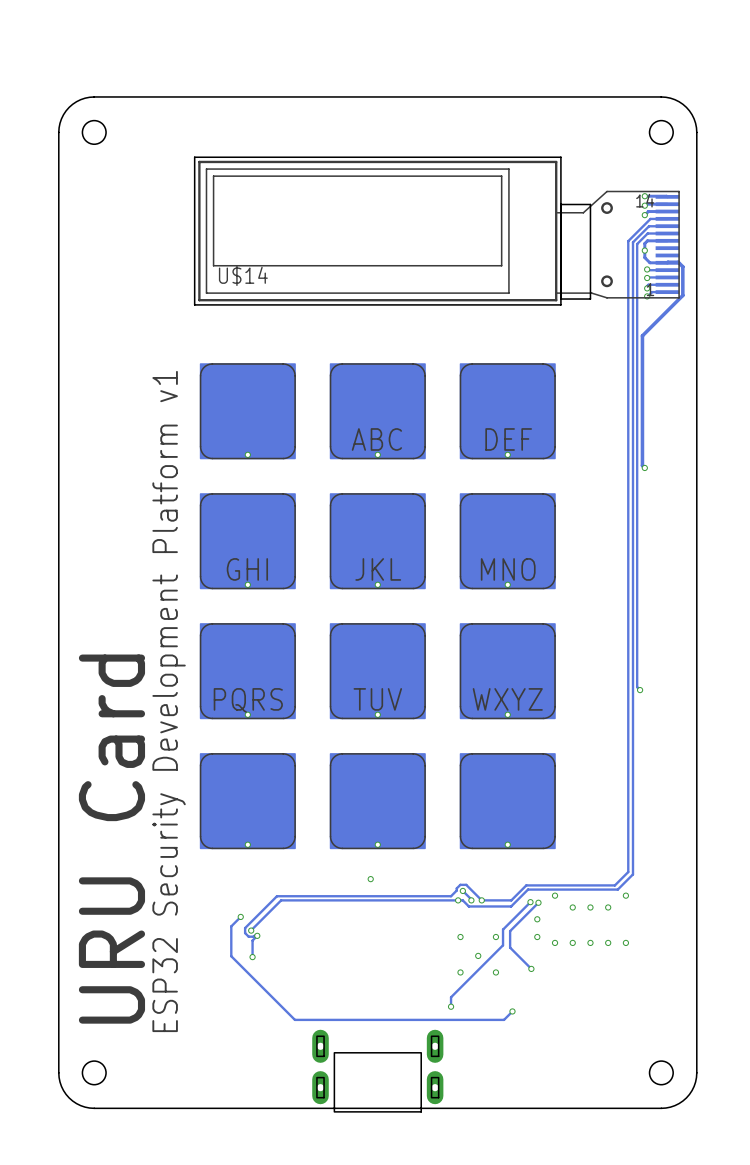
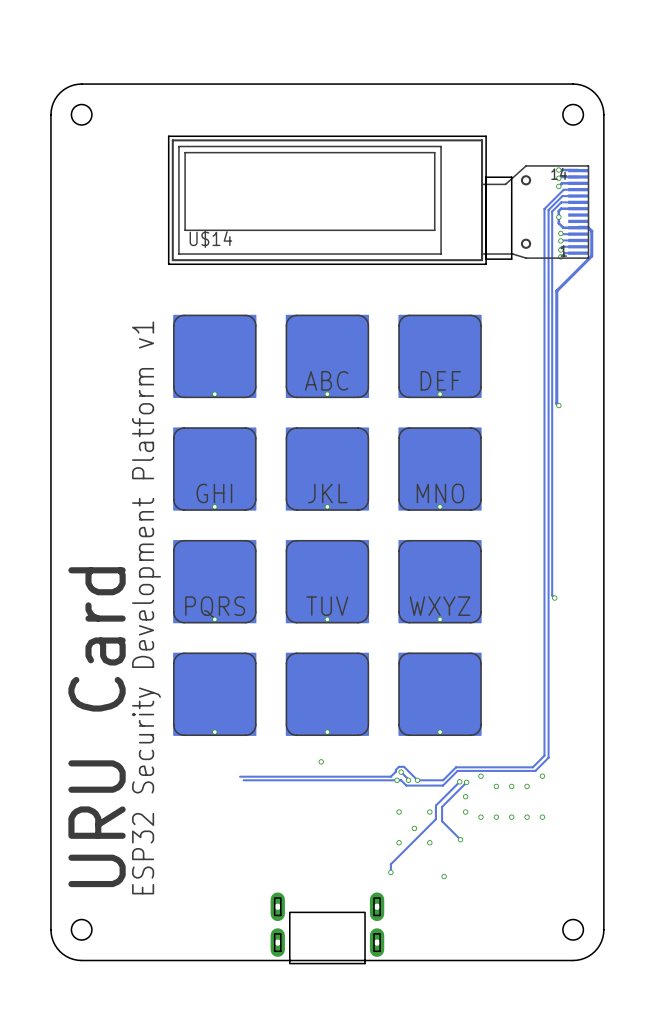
track: (276, 896) (245, 928) (245, 933) (248, 936) (257, 935) (252, 940) (252, 957) -> none
track: (281, 900) (251, 930) -> none
track: (240, 916) (231, 926) (231, 956) (294, 1019) (504, 1019) (512, 1011) -> none
via: (240, 916) -> none
via: (251, 930) -> none
via: (257, 935) -> none
via: (252, 957) -> none

